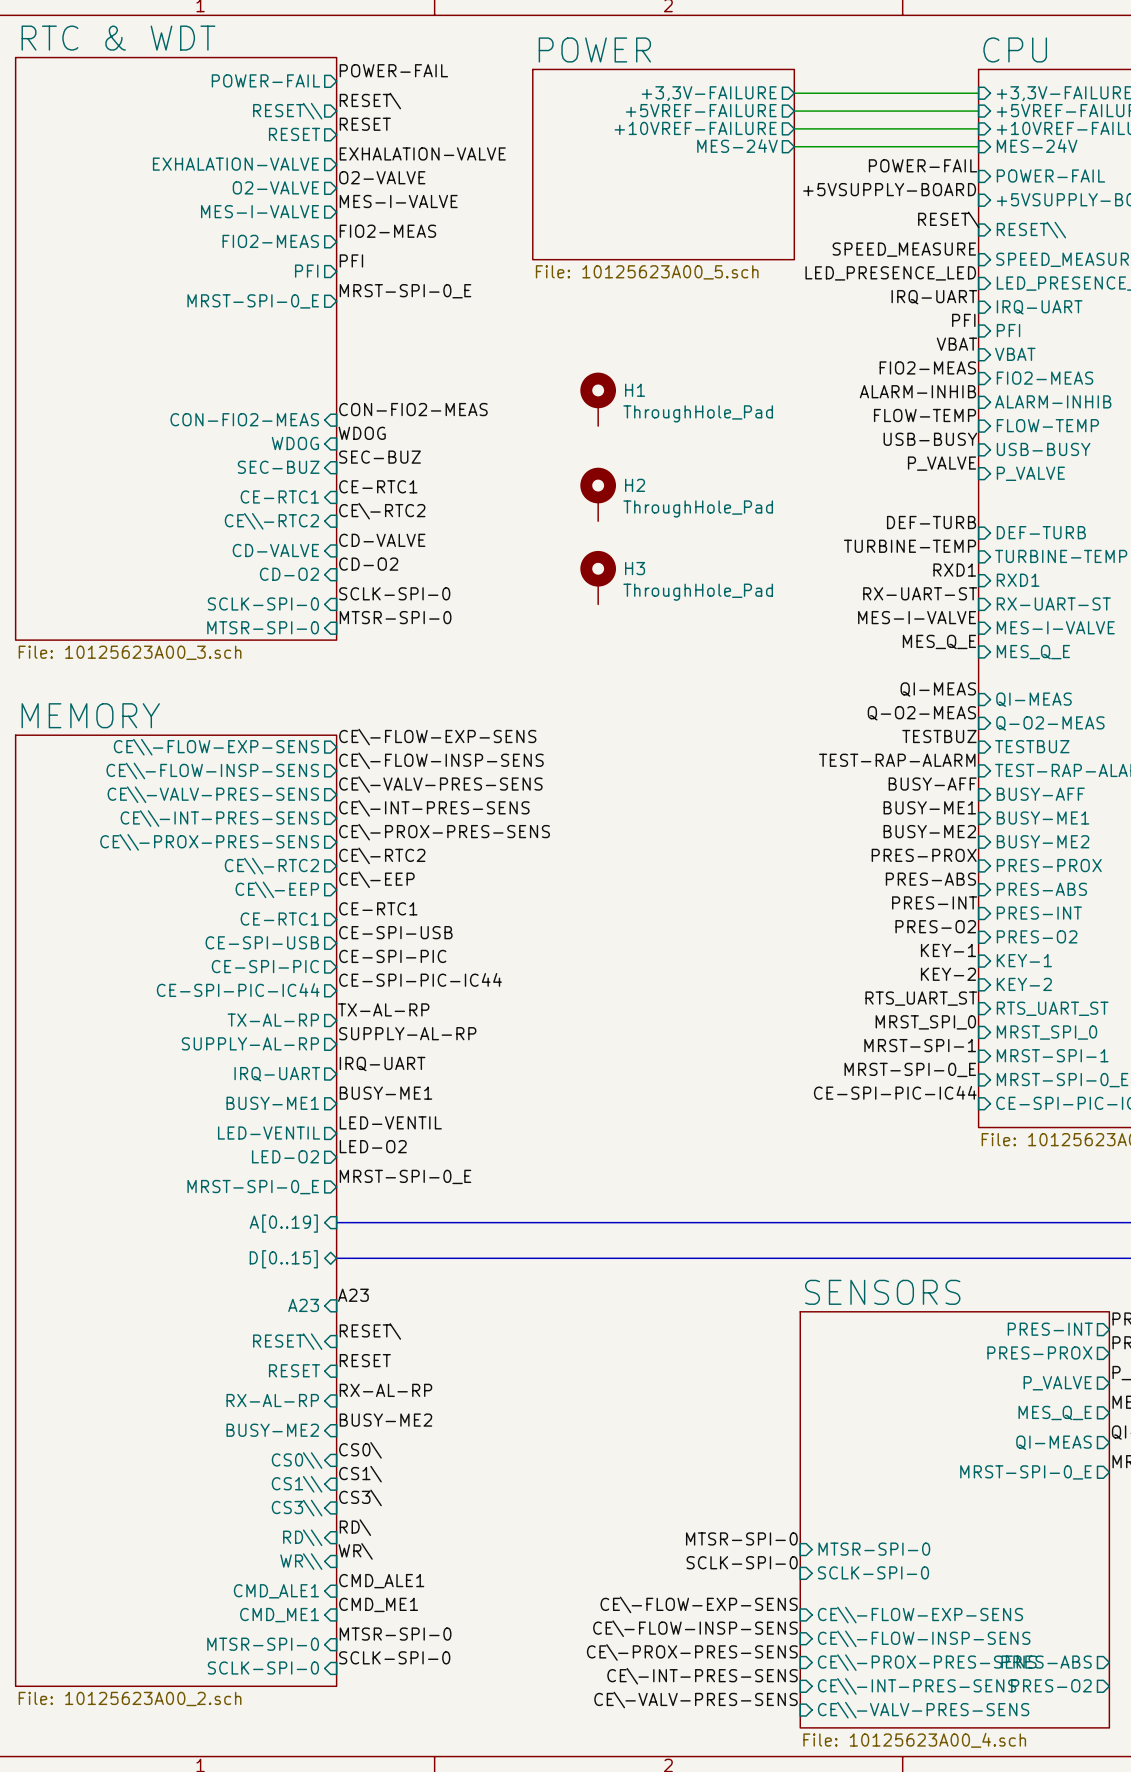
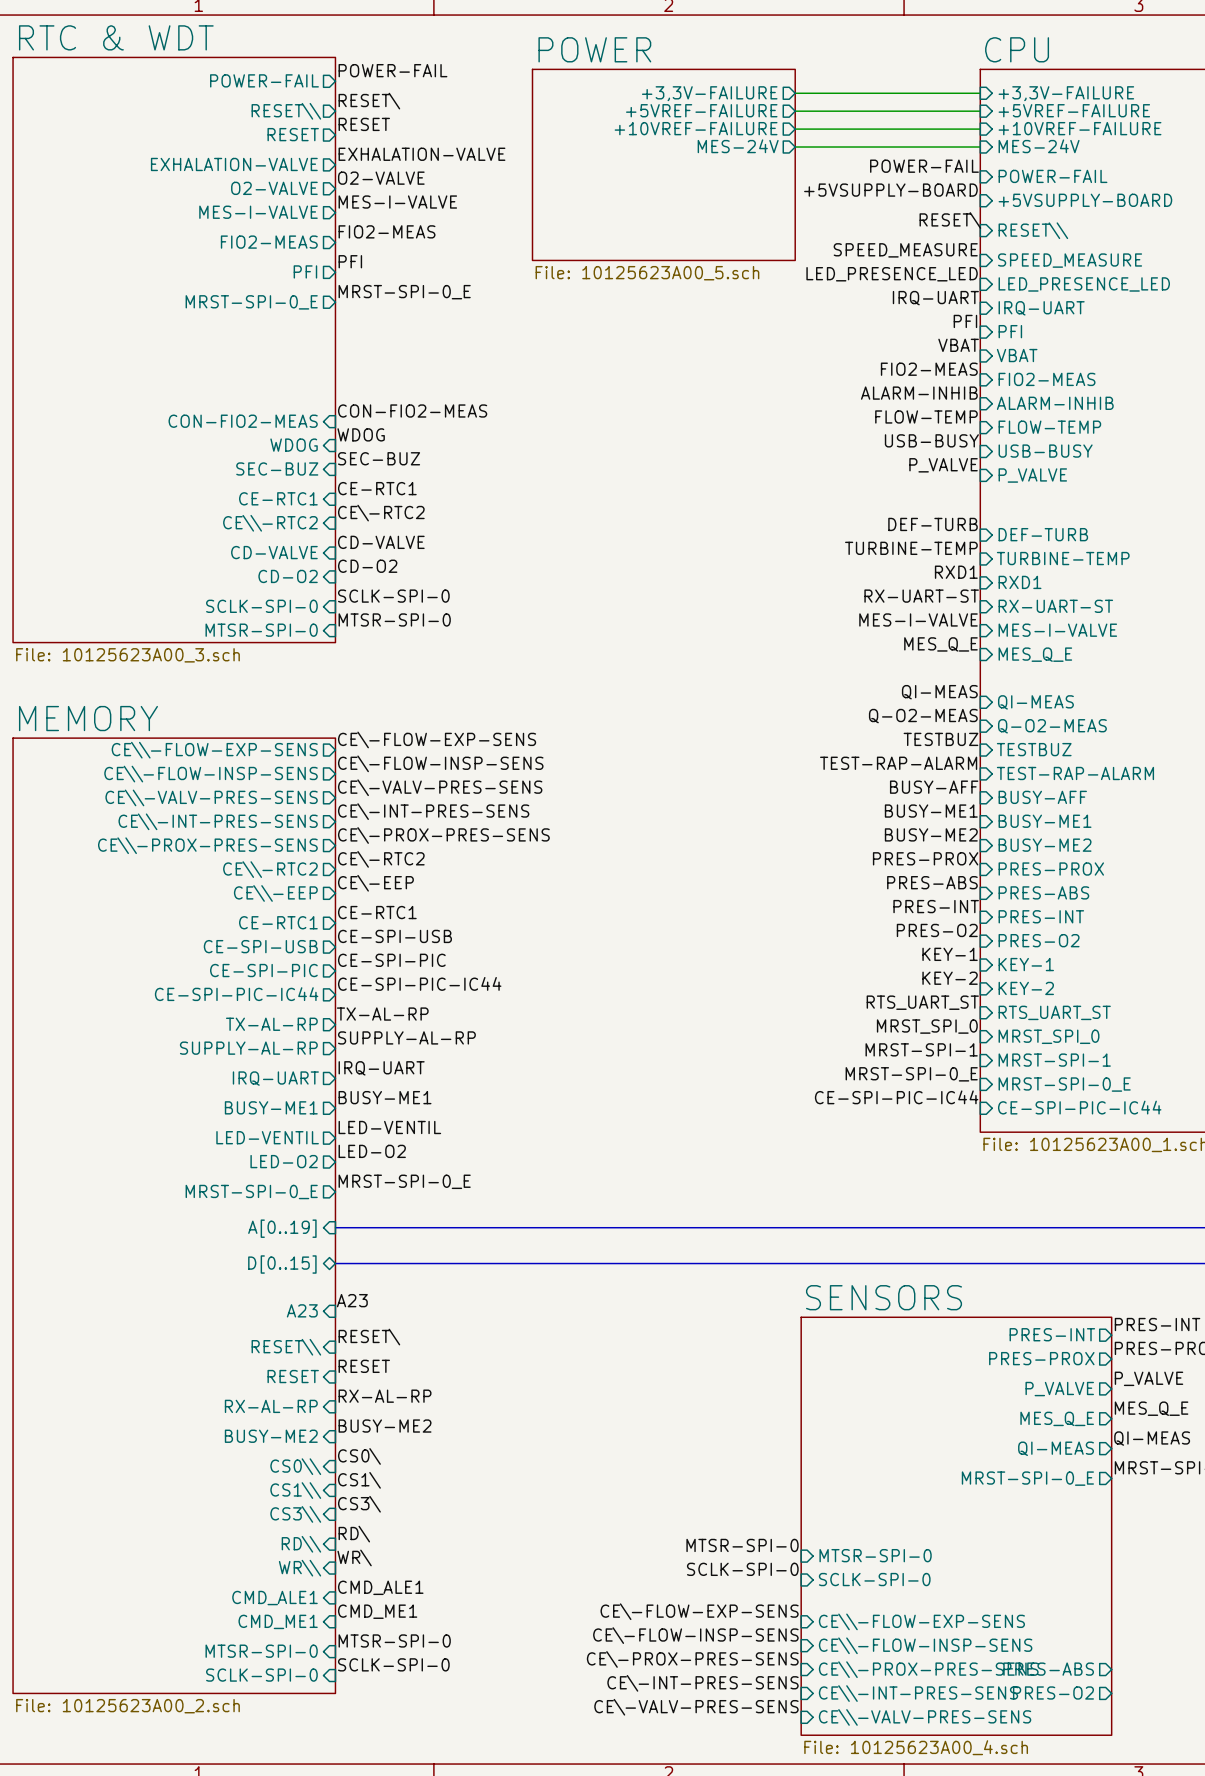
H1: ThroughHole_Pad (598, 399) -> none
H2: ThroughHole_Pad (598, 494) -> none
H3: ThroughHole_Pad (598, 577) -> none

